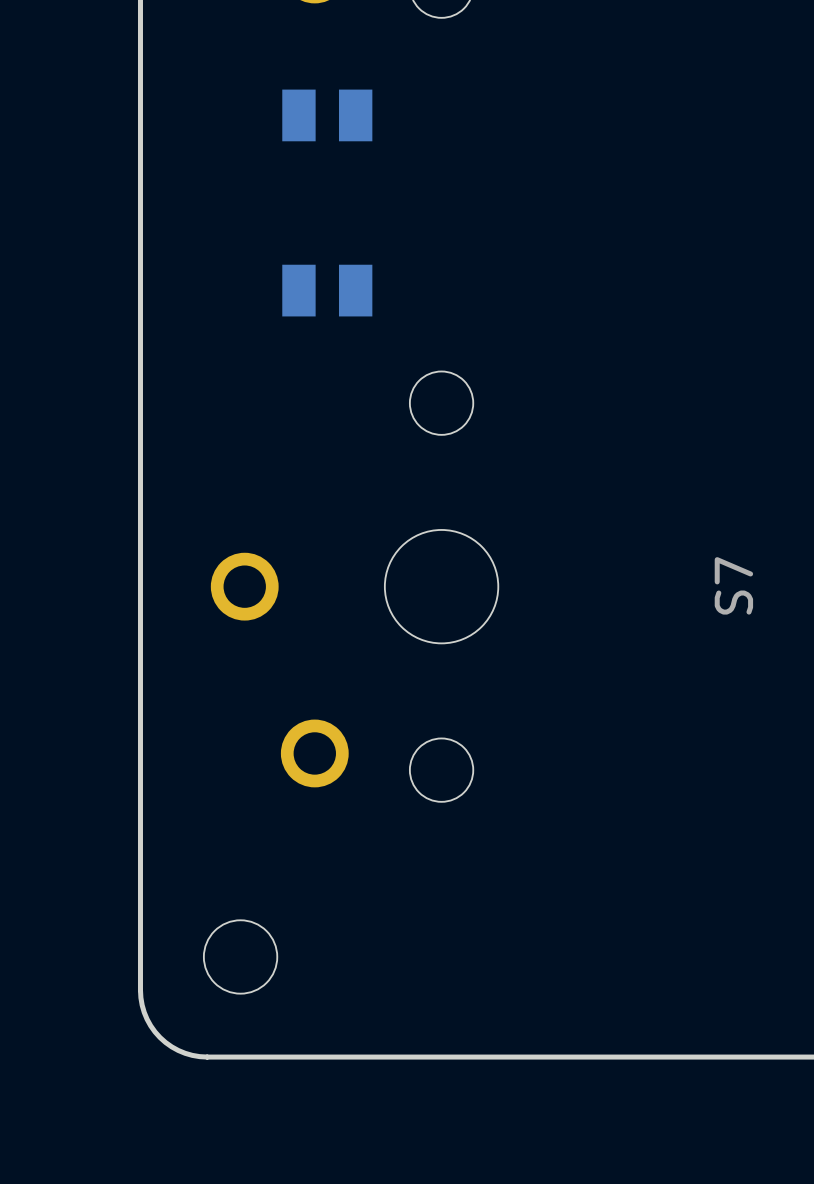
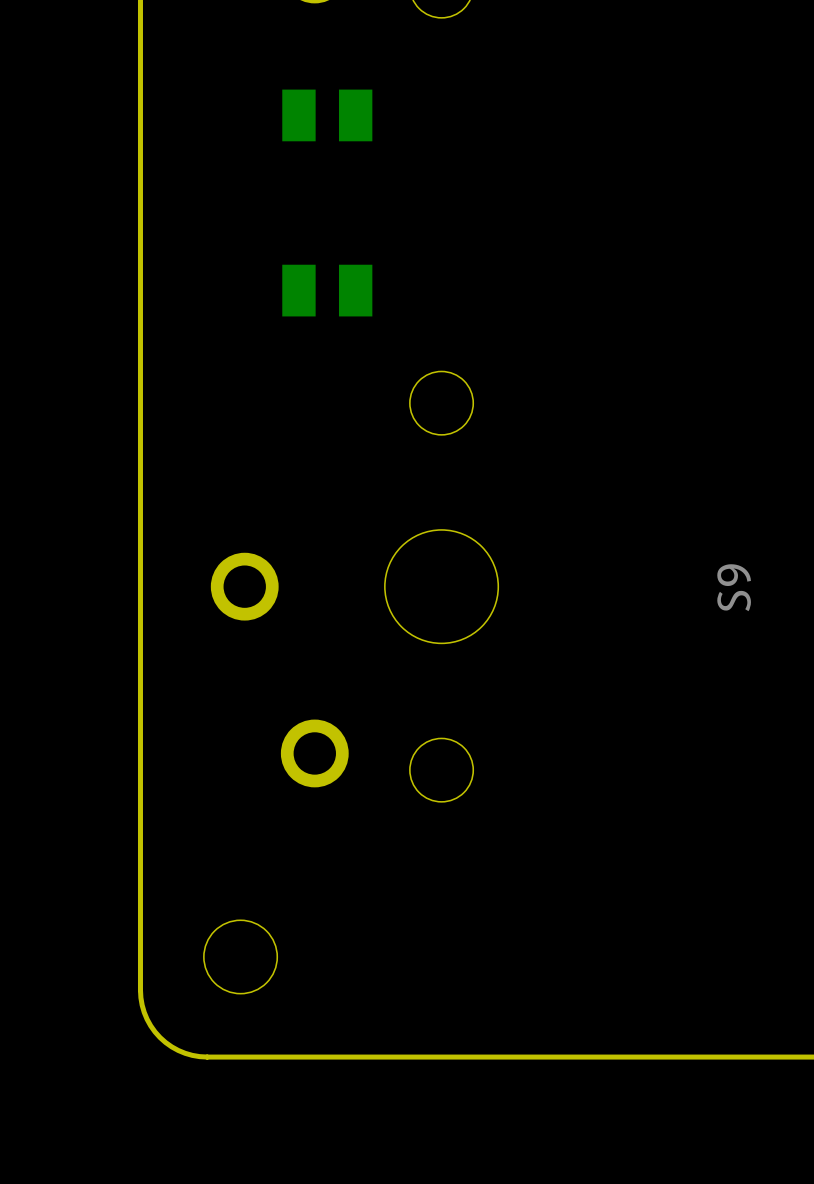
S7 name: S7 (733, 585) -> S9 (734, 587)

